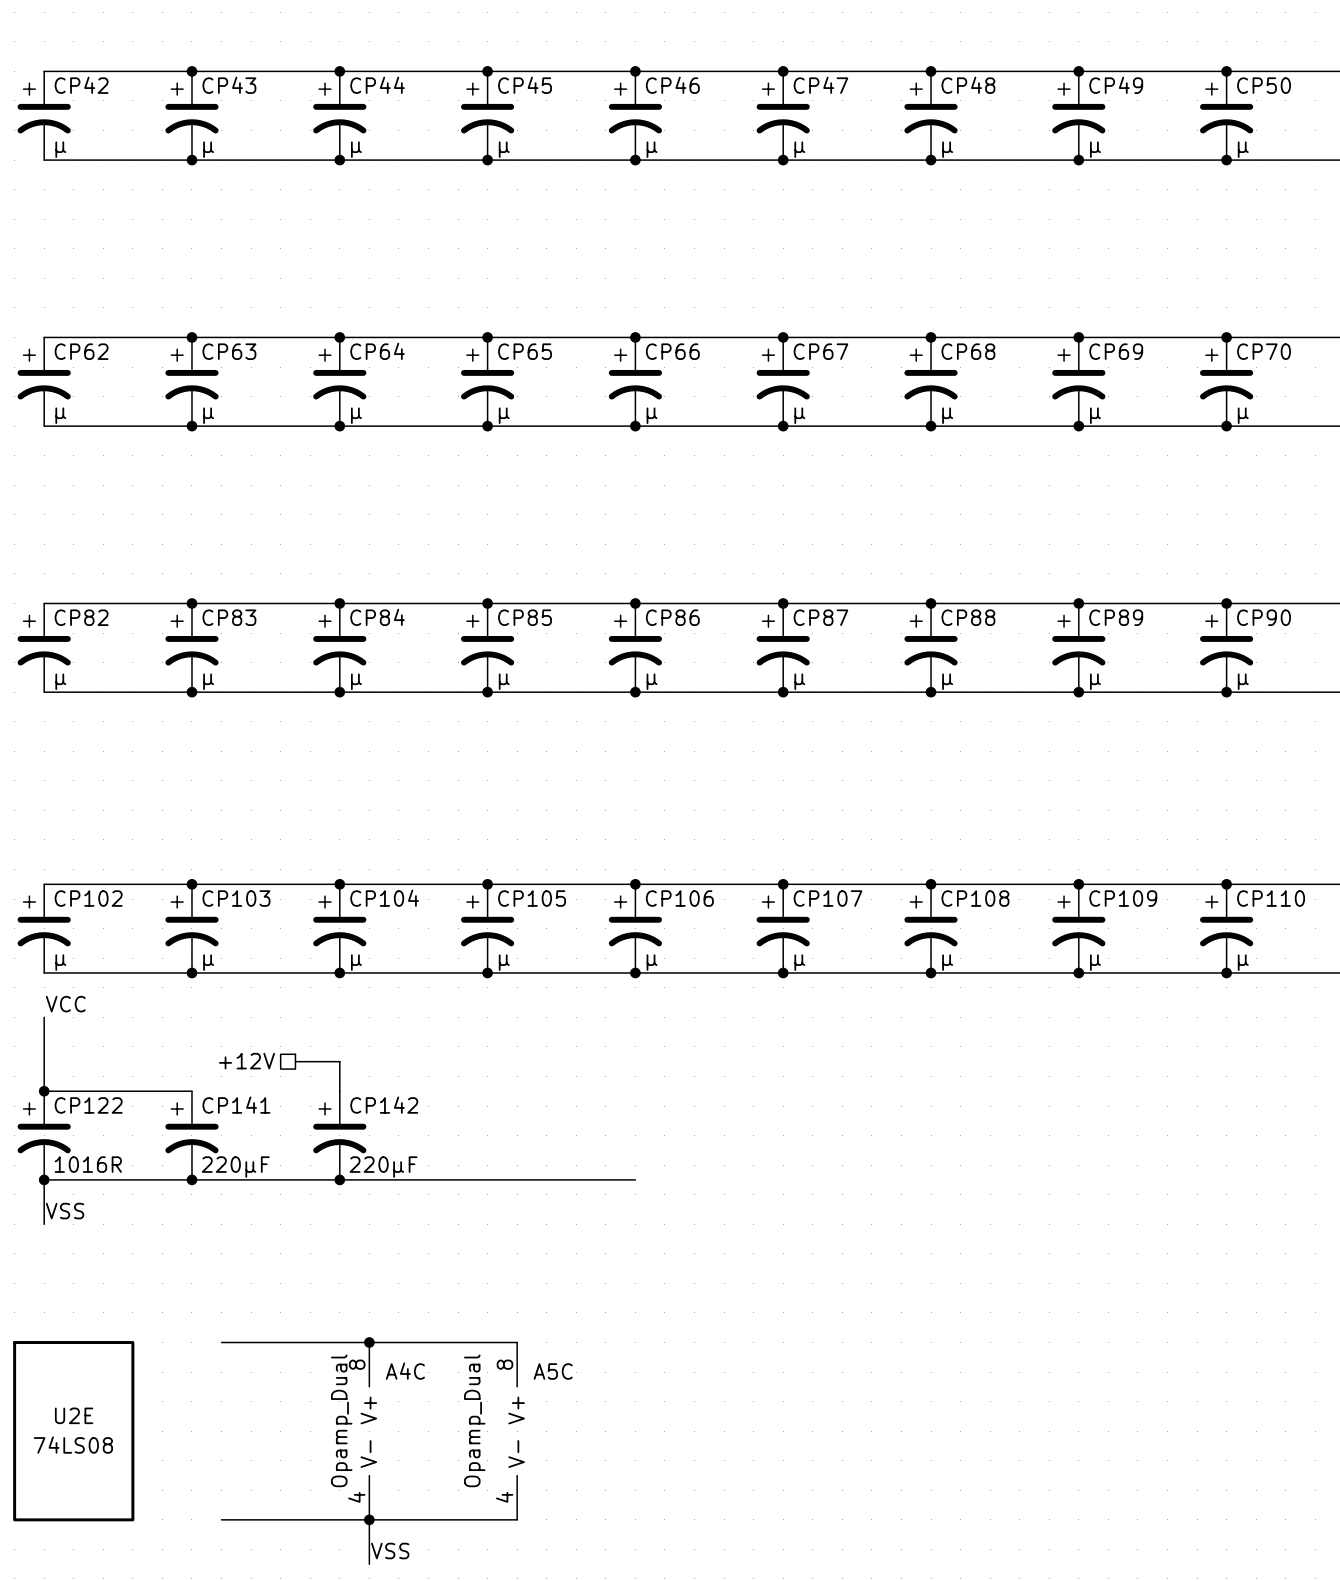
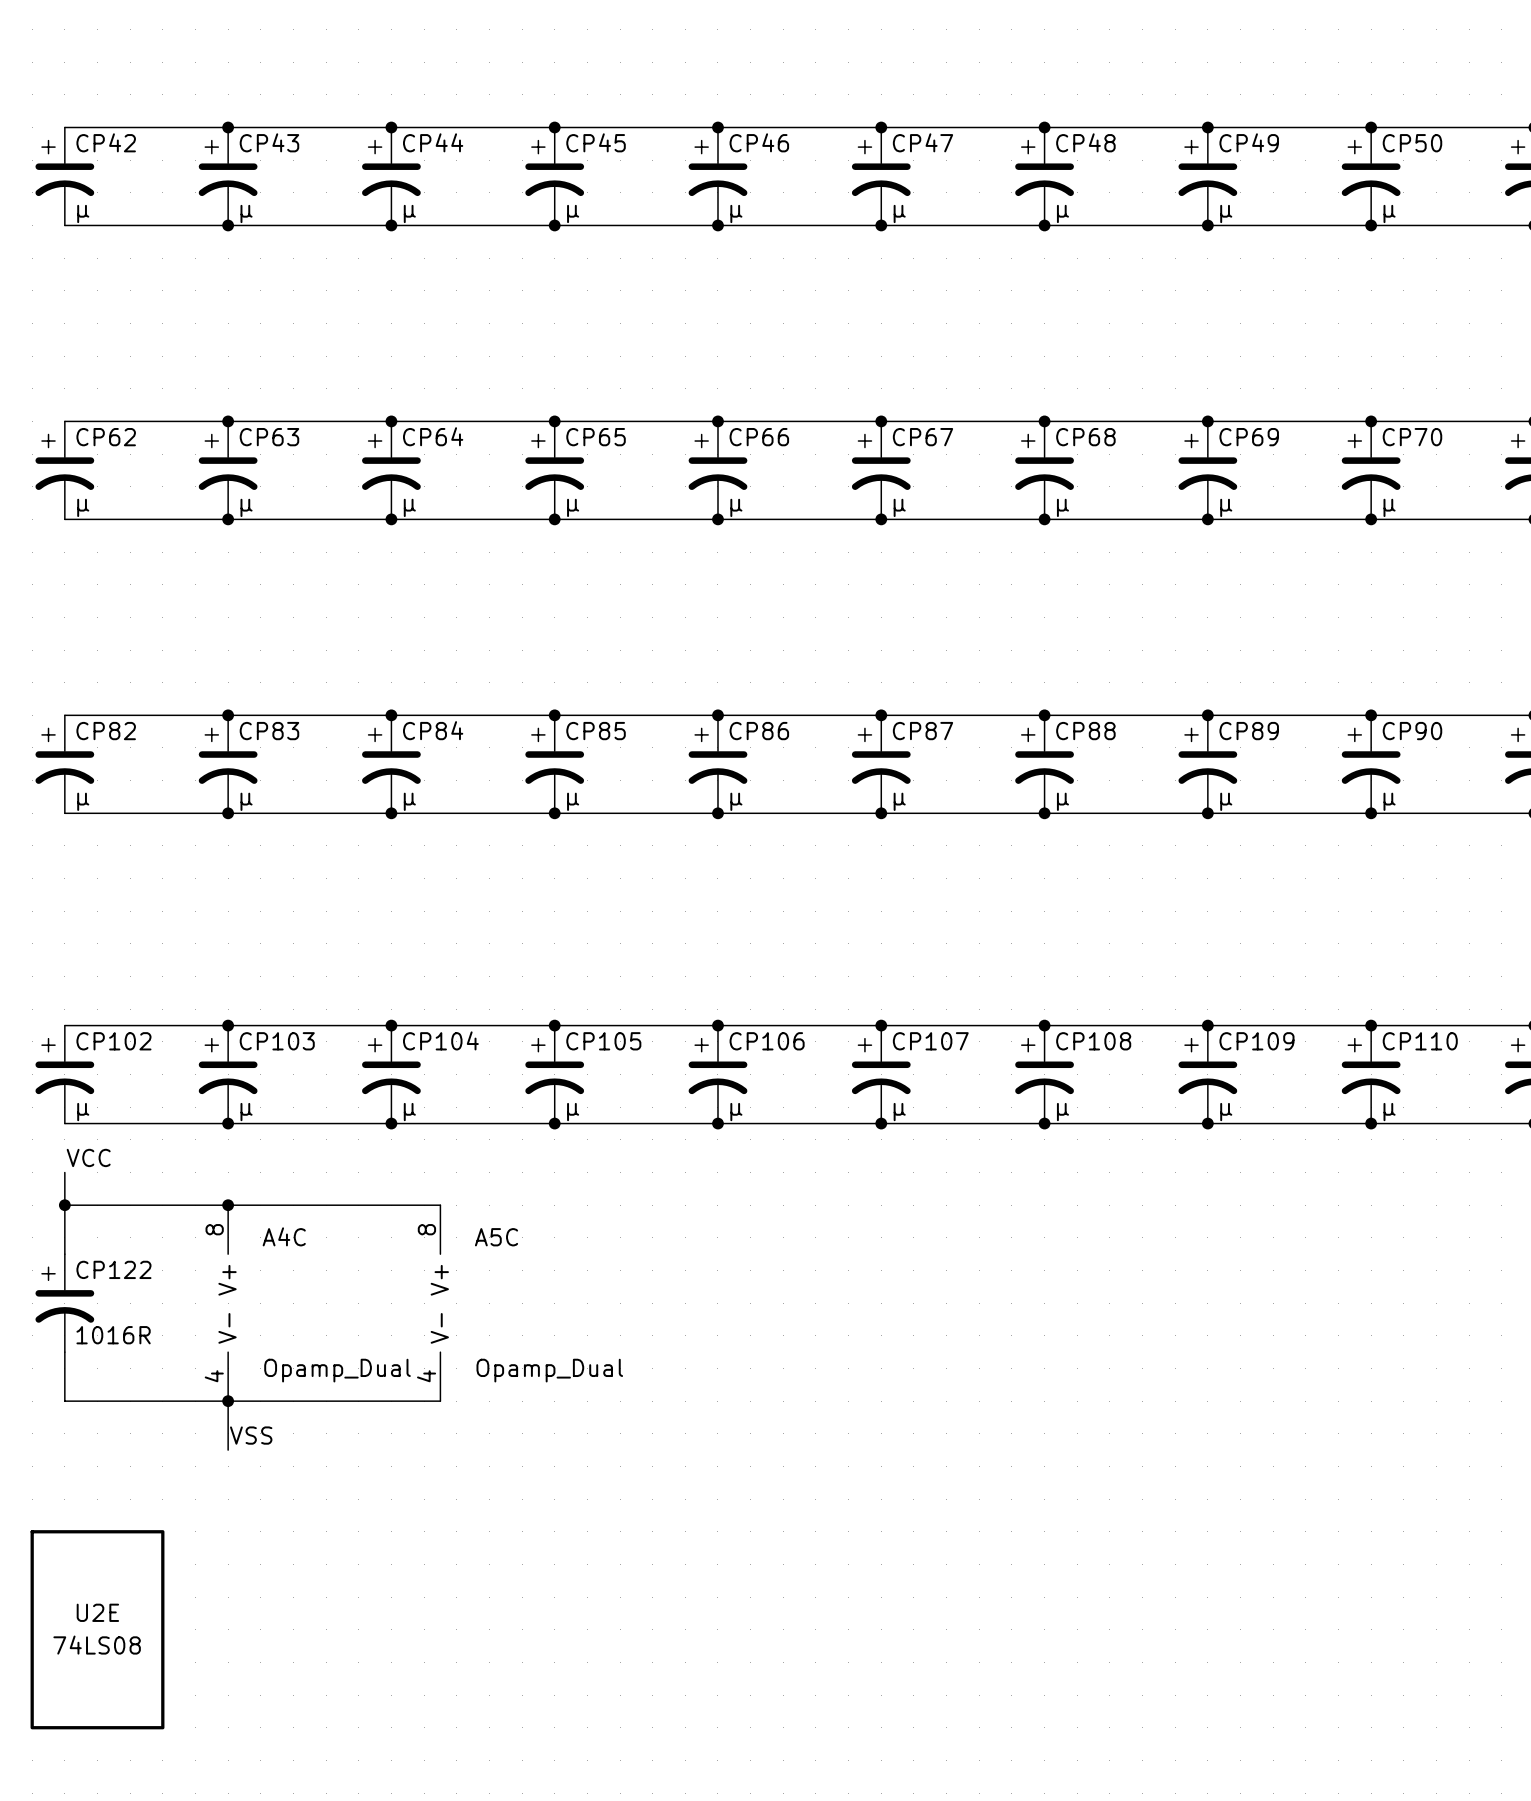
wire: none -> (64, 1205) (440, 1205)
junction: none -> (228, 1205)
hierarchical label: +12V (247, 1061) -> none
wire: (295, 1061) (339, 1061) (339, 1091) -> none
wire: (44, 1091) (191, 1091) -> none
junction position: (44, 1091) -> (64, 1205)
CP141: 220μF (191, 1135) -> none
CP142: 220μF (339, 1135) -> none
wire: (44, 1179) (635, 1179) -> none
junction: (44, 1179) -> none
junction position: (191, 1179) -> (228, 1401)
junction: (339, 1179) -> none
label position: VSS (65, 1211) -> VSS (251, 1435)
wire: none -> (64, 1401) (440, 1401)
wire: none -> (228, 1401) (228, 1450)
wire: (221, 1342) (517, 1342) -> none
junction: (369, 1342) -> none
A4C name position: A4C (405, 1371) -> A4C (284, 1236)
A5C name position: A5C (553, 1371) -> A5C (496, 1237)
A4C value rotation: 0° (341, 1420) -> 90° clockwise (337, 1370)
A4C value position: Opamp_Dual (341, 1420) -> Opamp_Dual (337, 1370)
A5C value rotation: 0° (474, 1420) -> 90° clockwise (549, 1370)
A5C value position: Opamp_Dual (474, 1420) -> Opamp_Dual (549, 1370)
A4C position: (369, 1431) -> (228, 1303)
A5C position: (517, 1431) -> (440, 1303)
wire: (221, 1519) (517, 1519) -> none
wire: (369, 1519) (369, 1564) -> none
junction: (369, 1519) -> none
label: VSS (390, 1551) -> none

